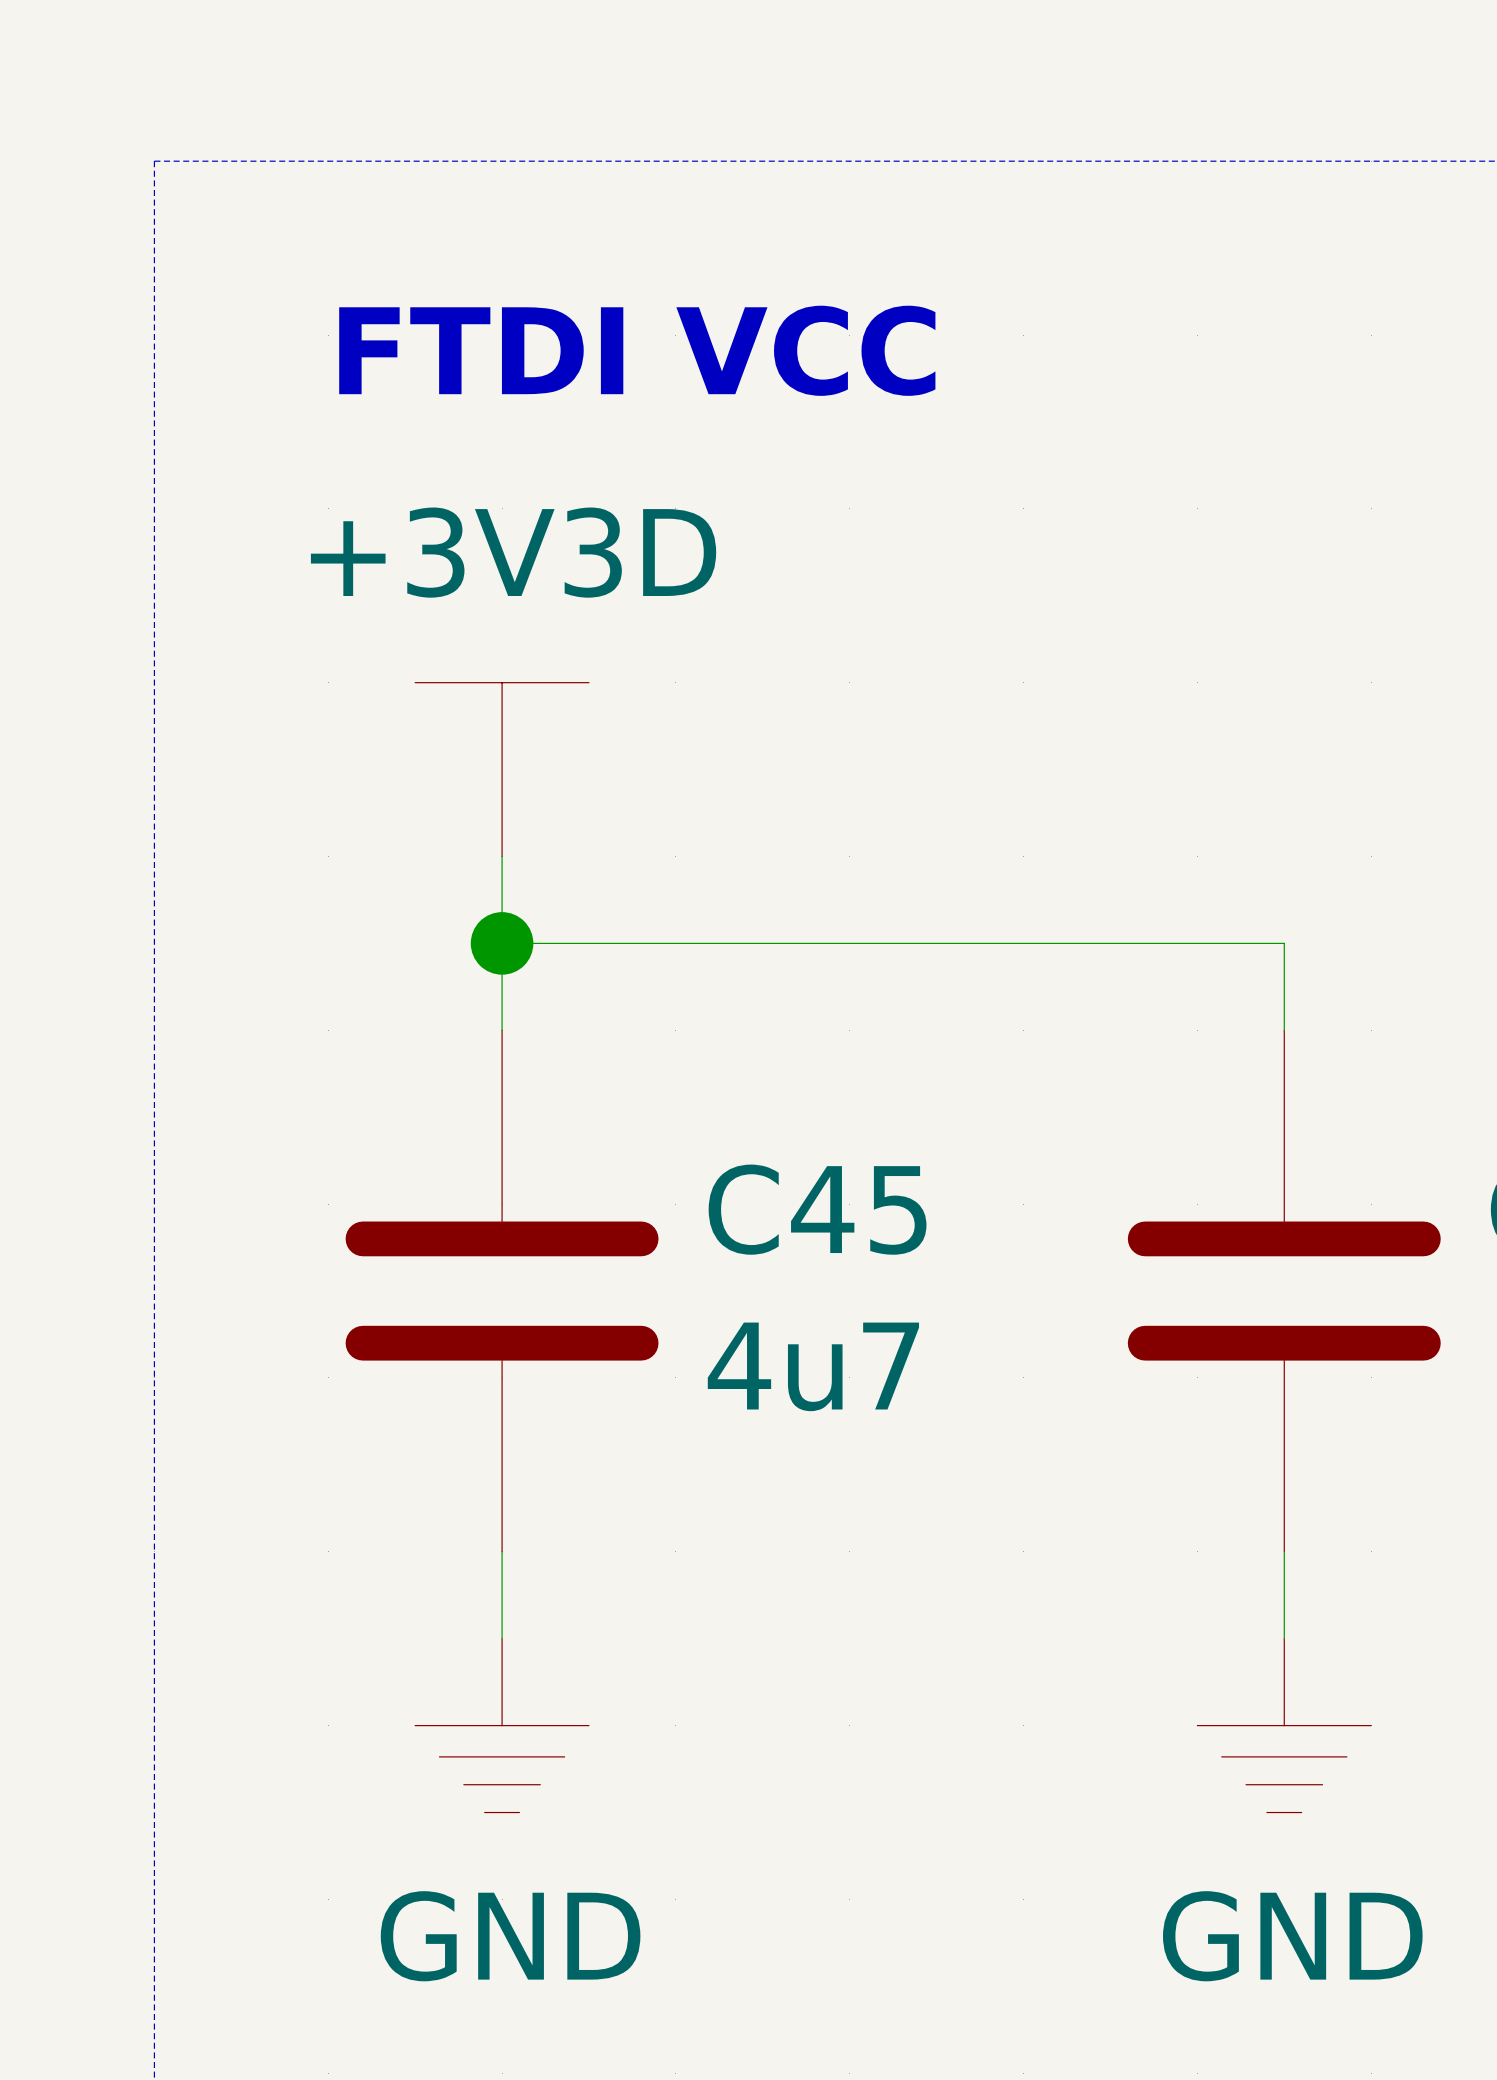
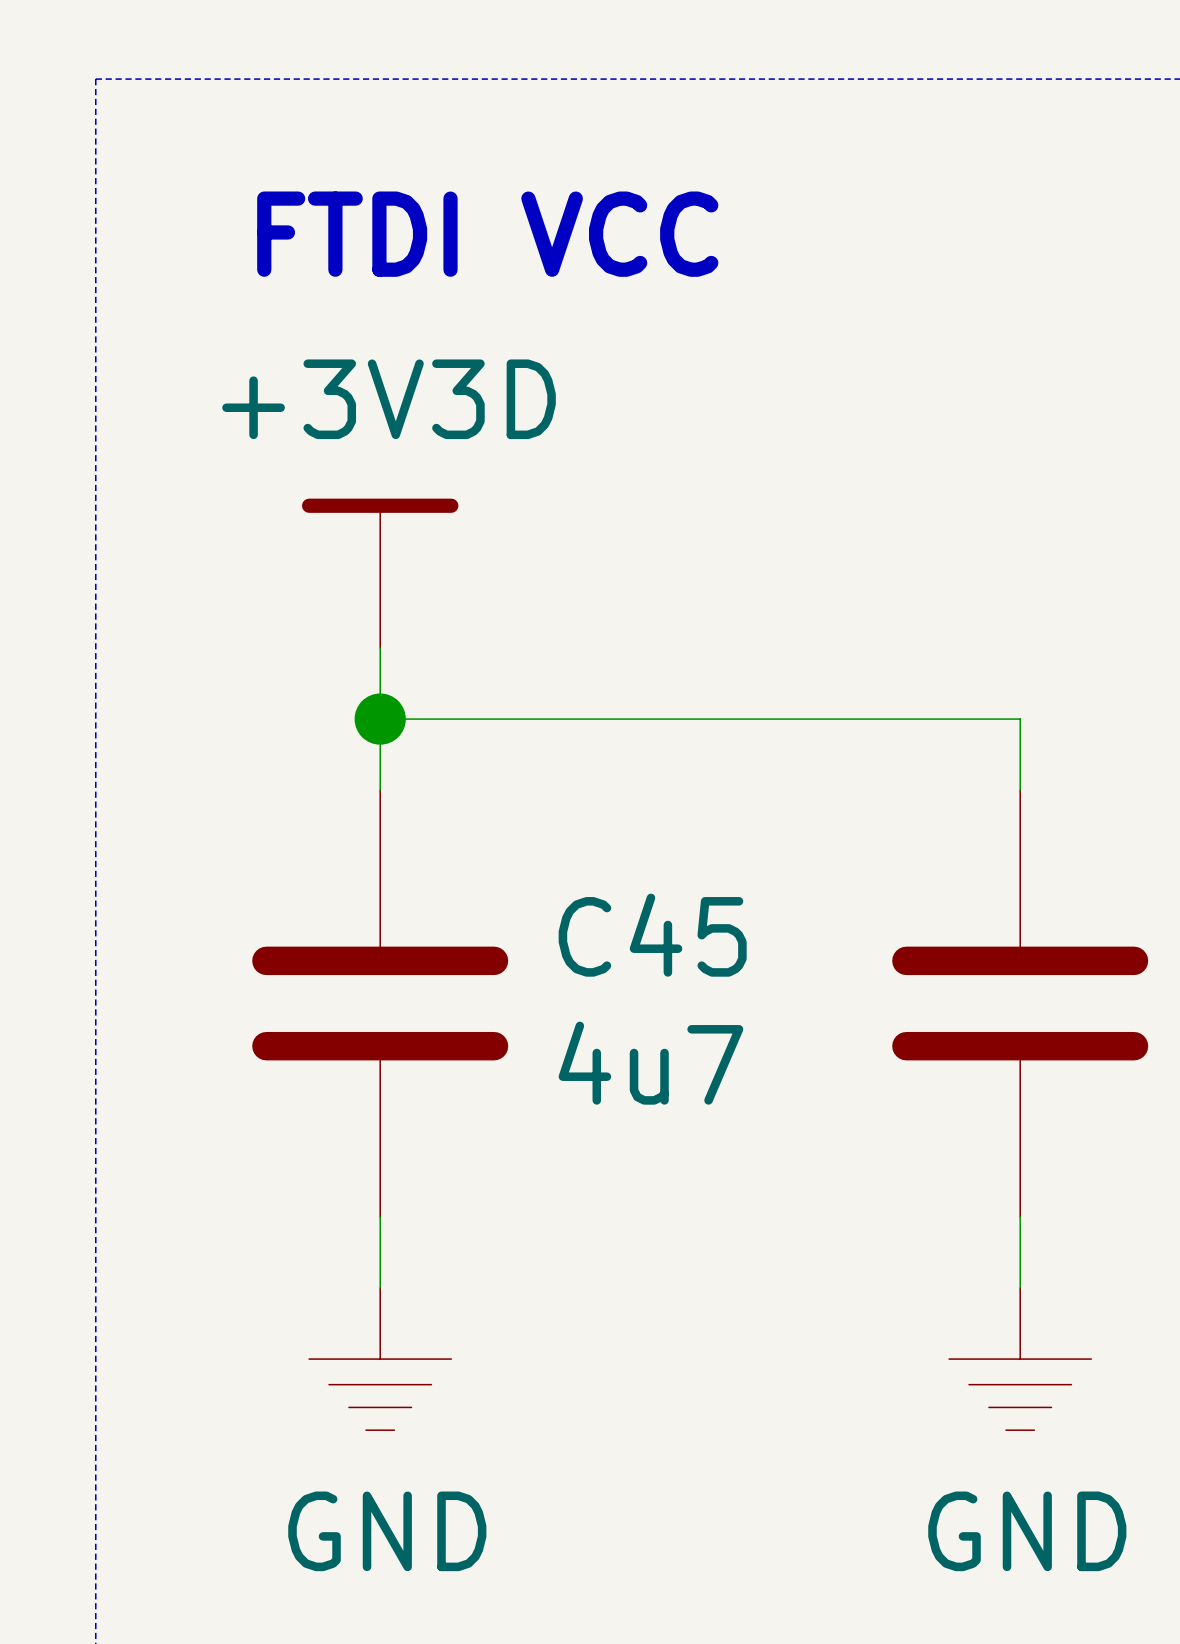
power symbol shape: [415, 682, 589, 857] -> [301, 498, 459, 648]

